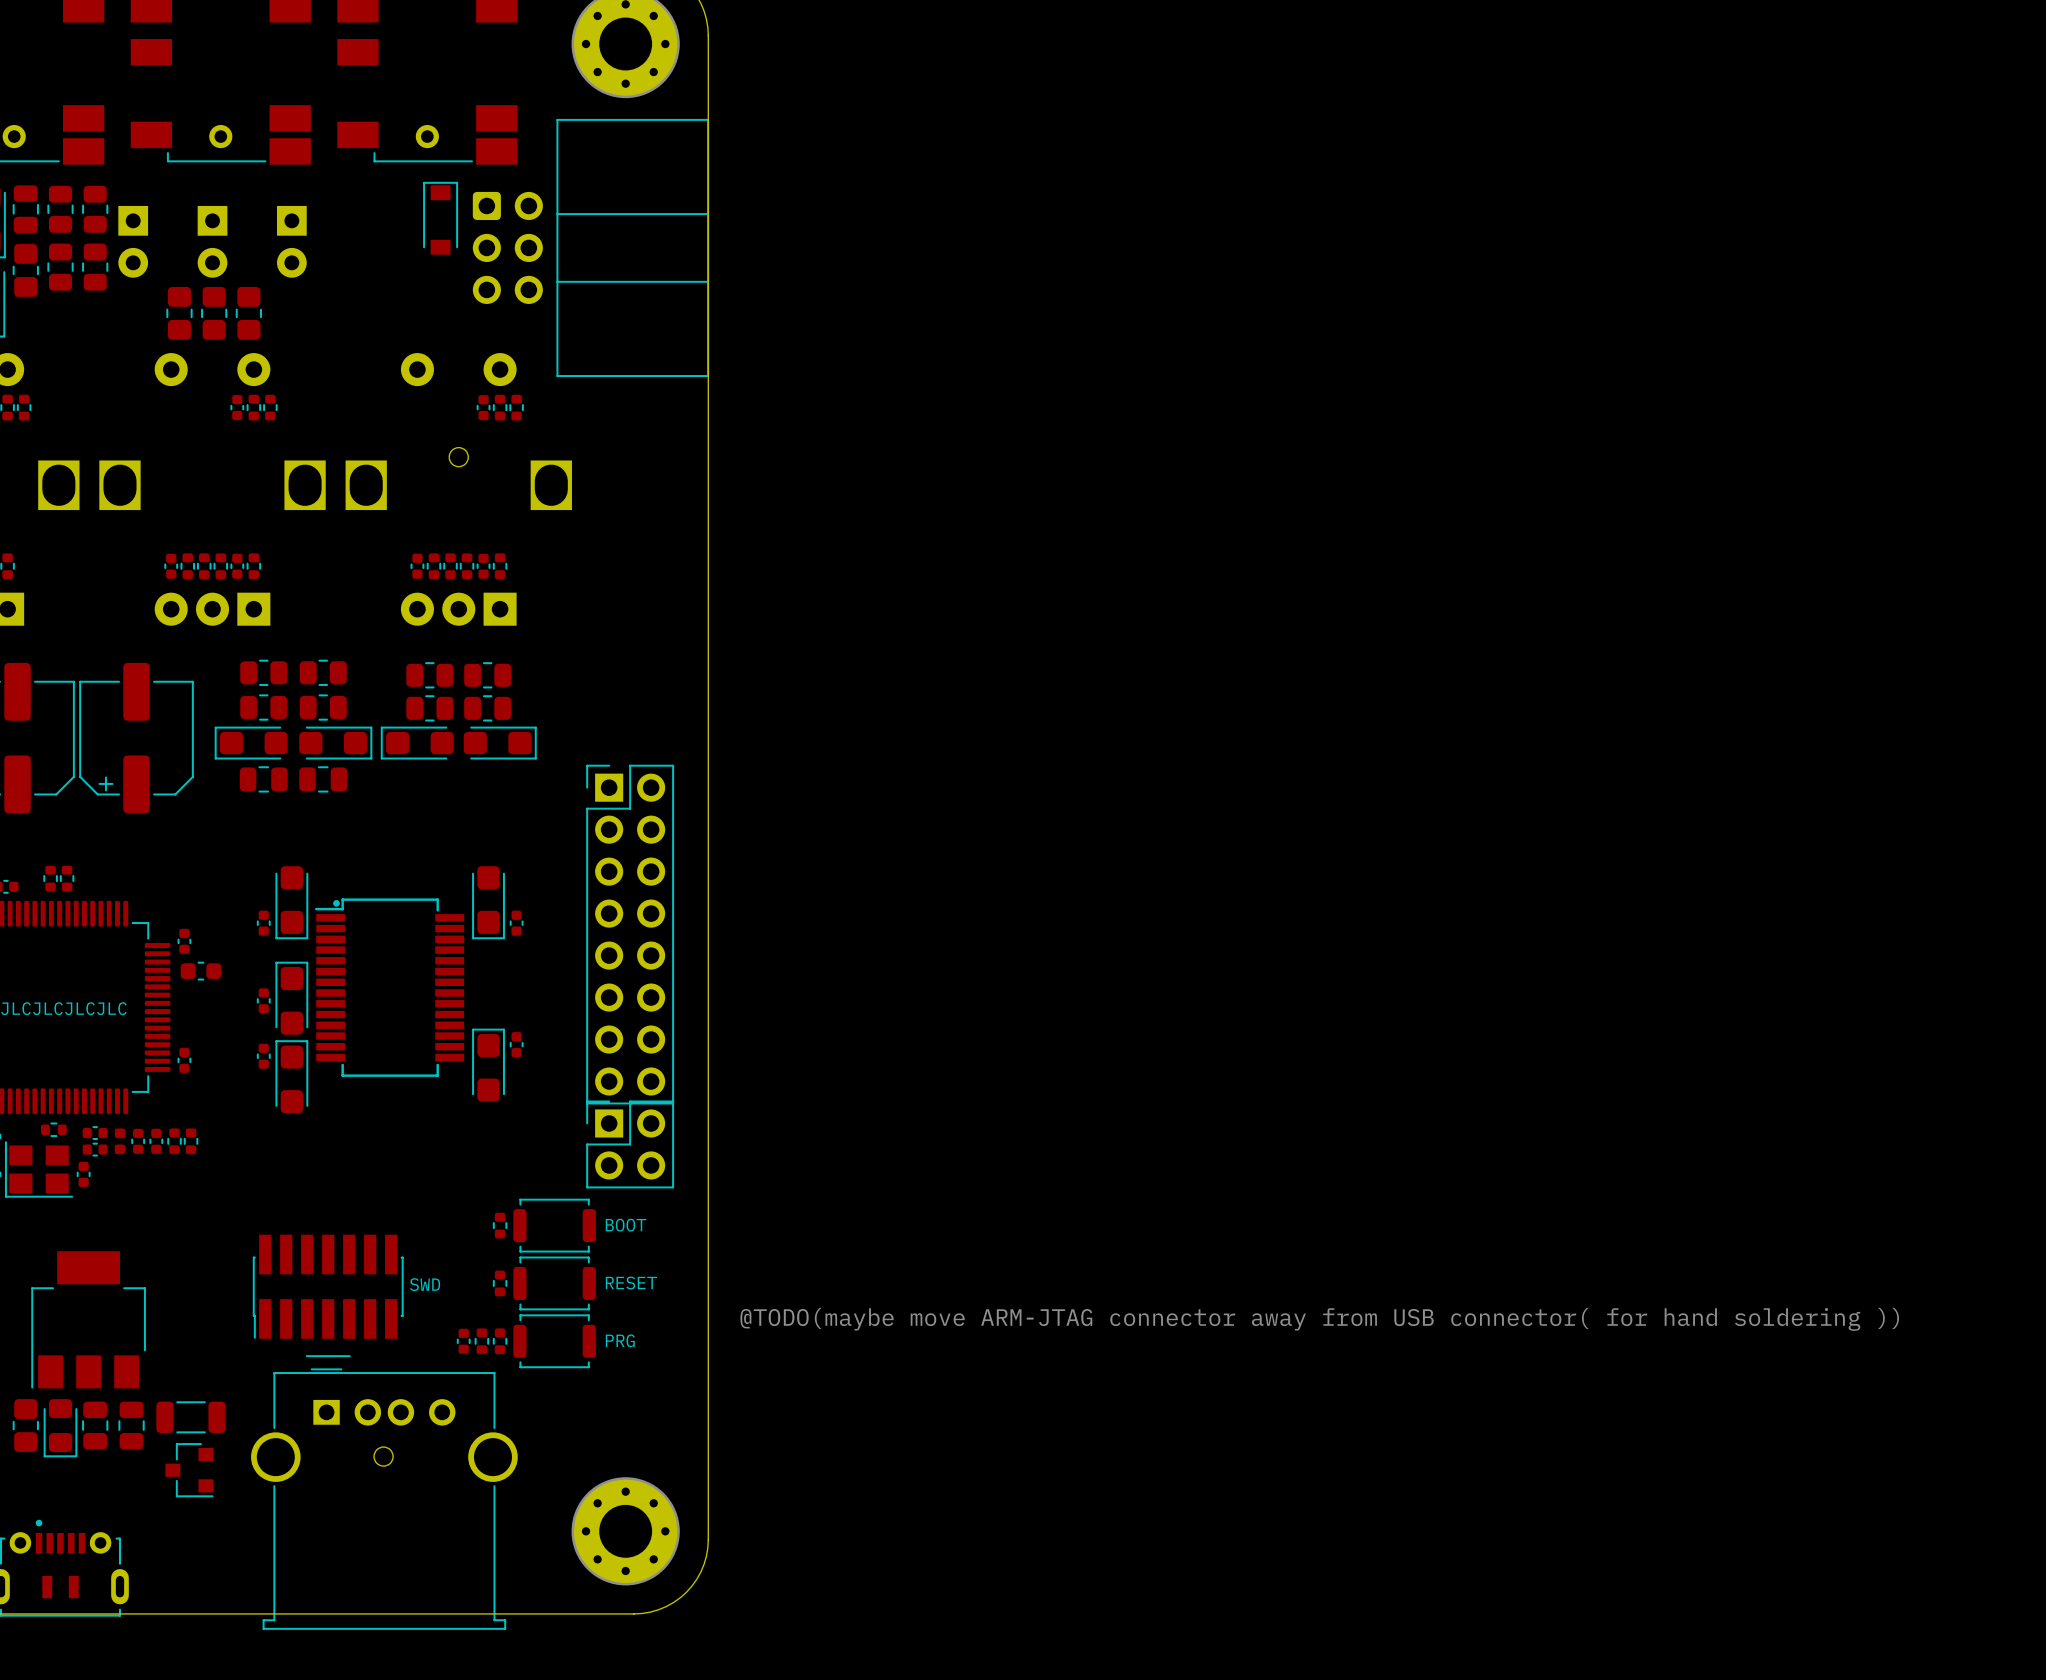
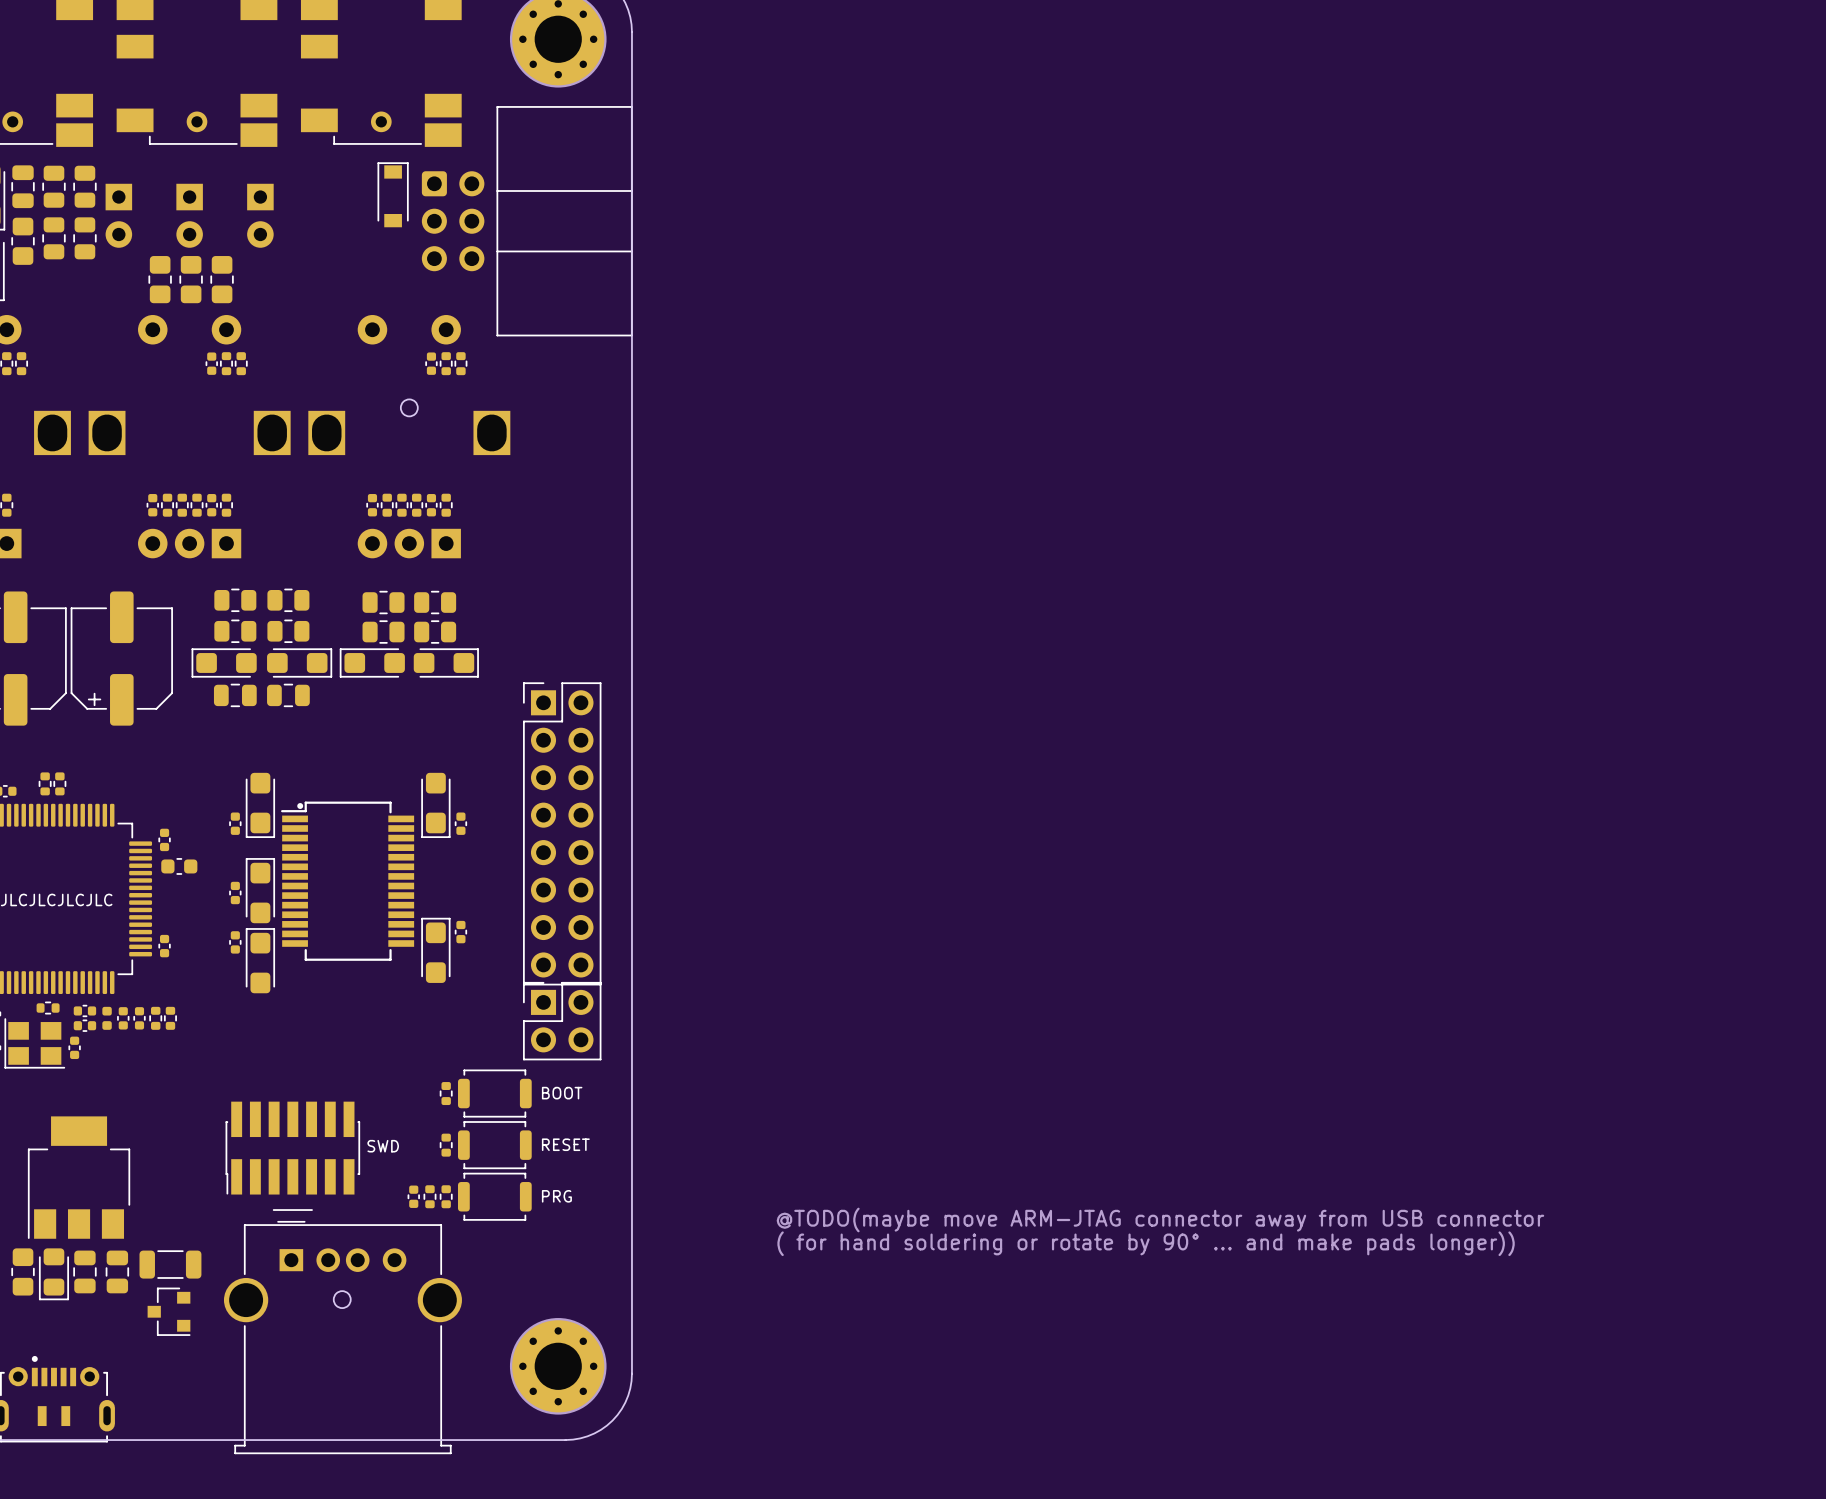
text: @TODO(maybe move ARM-JTAG connector away from USB connector( for hand soldering )) (1319, 1319) -> none
text: none -> @TODO(maybe move ARM-JTAG connector away from USB connector (1160, 1219)
text: none -> ( for hand soldering or rotate by 90° … and make pads longer)) (1146, 1243)

